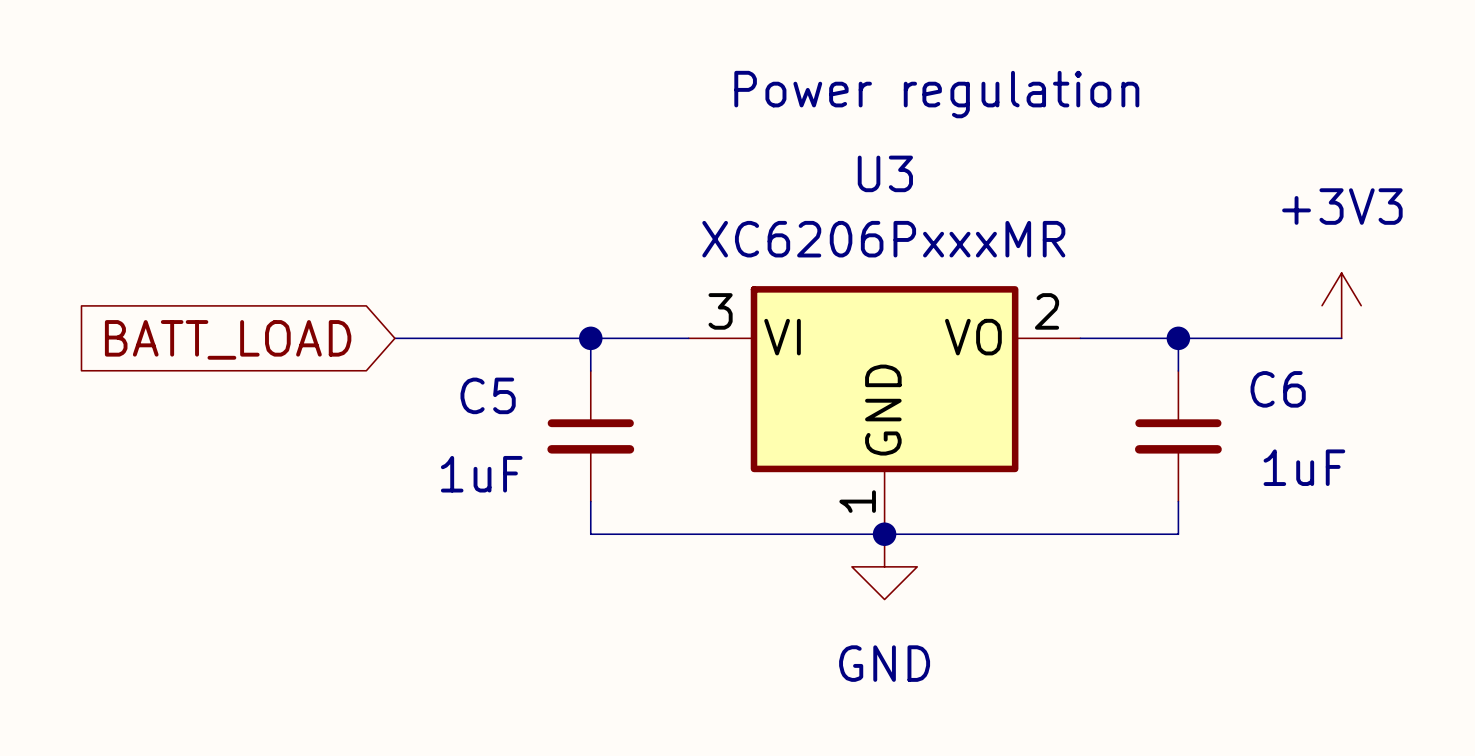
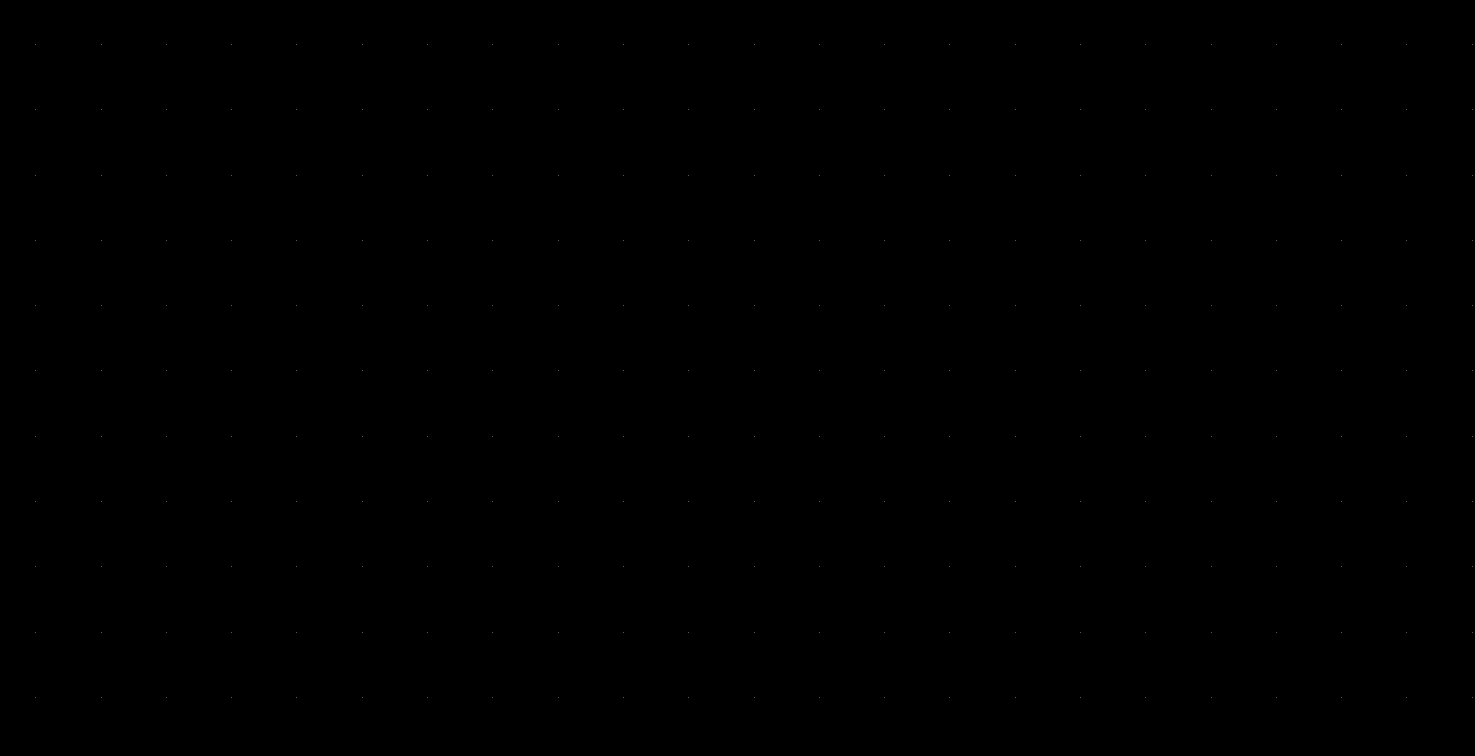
text: Power regulation (936, 94) -> none
power symbol: +3V3 (1341, 305) -> none
wire: (394, 338) (688, 338) -> none
wire: (590, 338) (590, 370) -> none
junction: (590, 338) -> none
wire: (1080, 338) (1341, 338) -> none
wire: (1178, 338) (1178, 370) -> none
junction: (1178, 338) -> none
global label: BATT_LOAD (228, 339) -> none
U3: XC6206PxxxMR (884, 410) -> none
C5: 1uF (590, 436) -> none
C6: 1uF (1178, 436) -> none
wire: (590, 501) (590, 534) (1178, 534) (1178, 501) -> none
junction: (884, 534) -> none
power symbol: GND (884, 566) -> none

